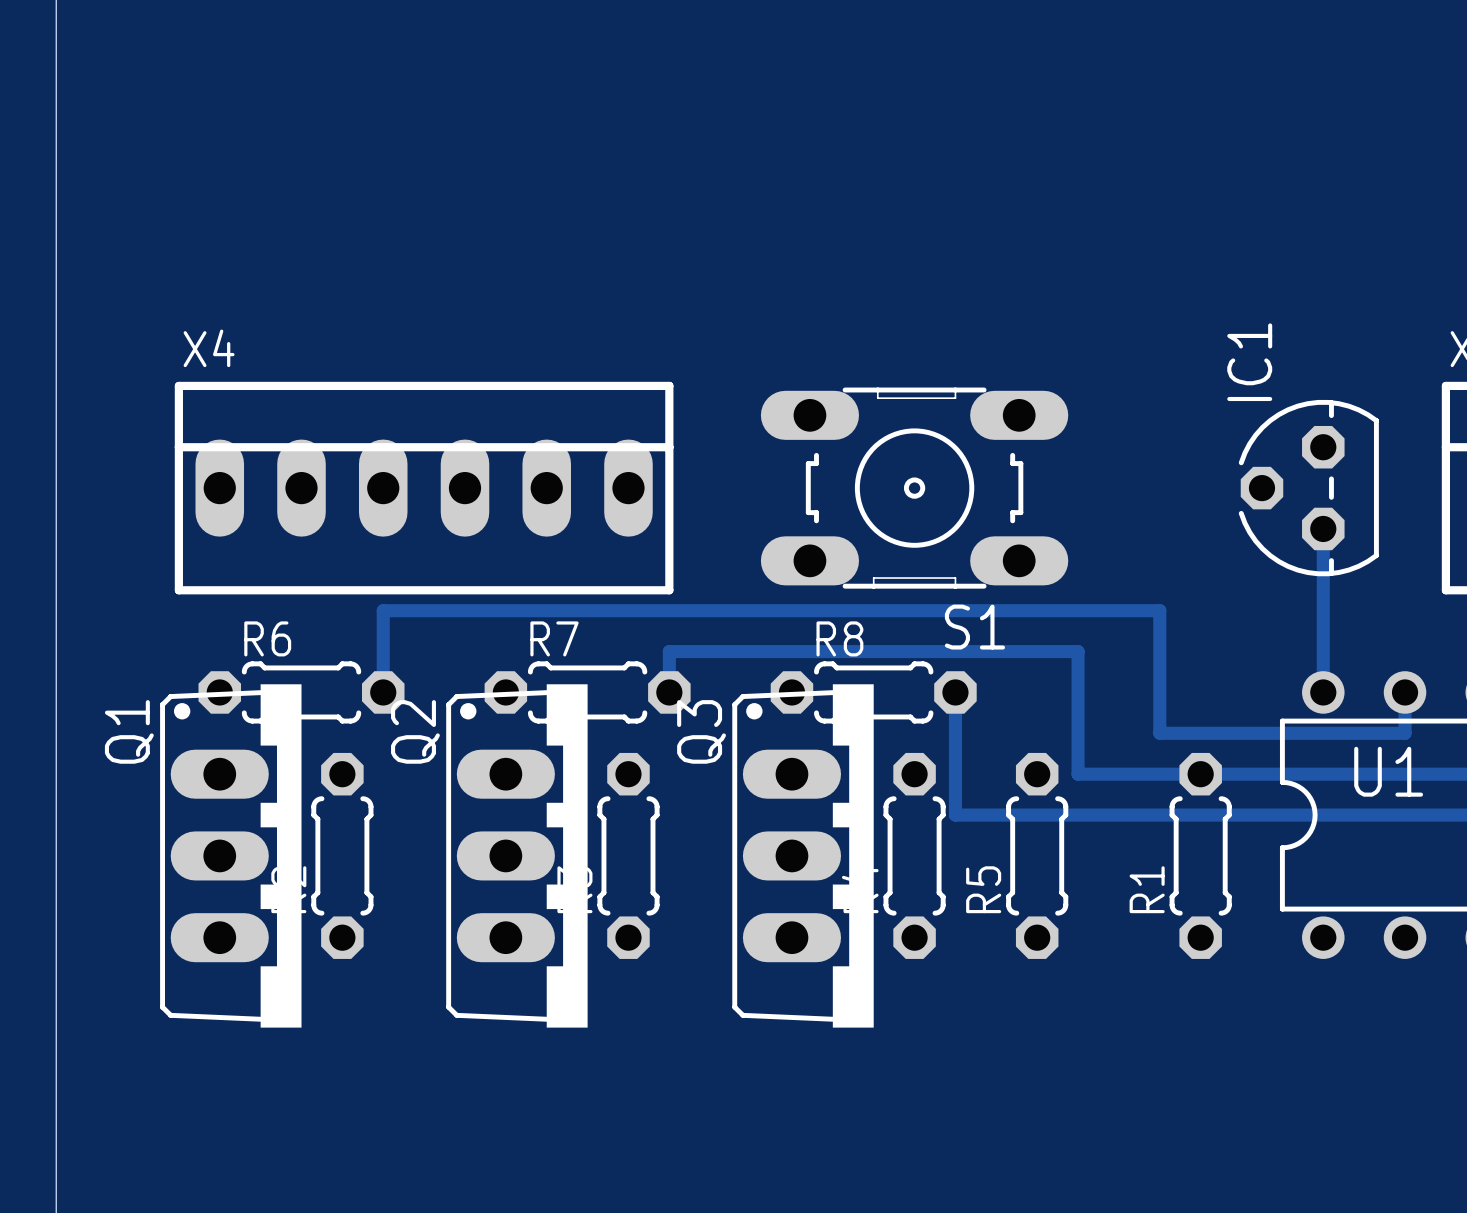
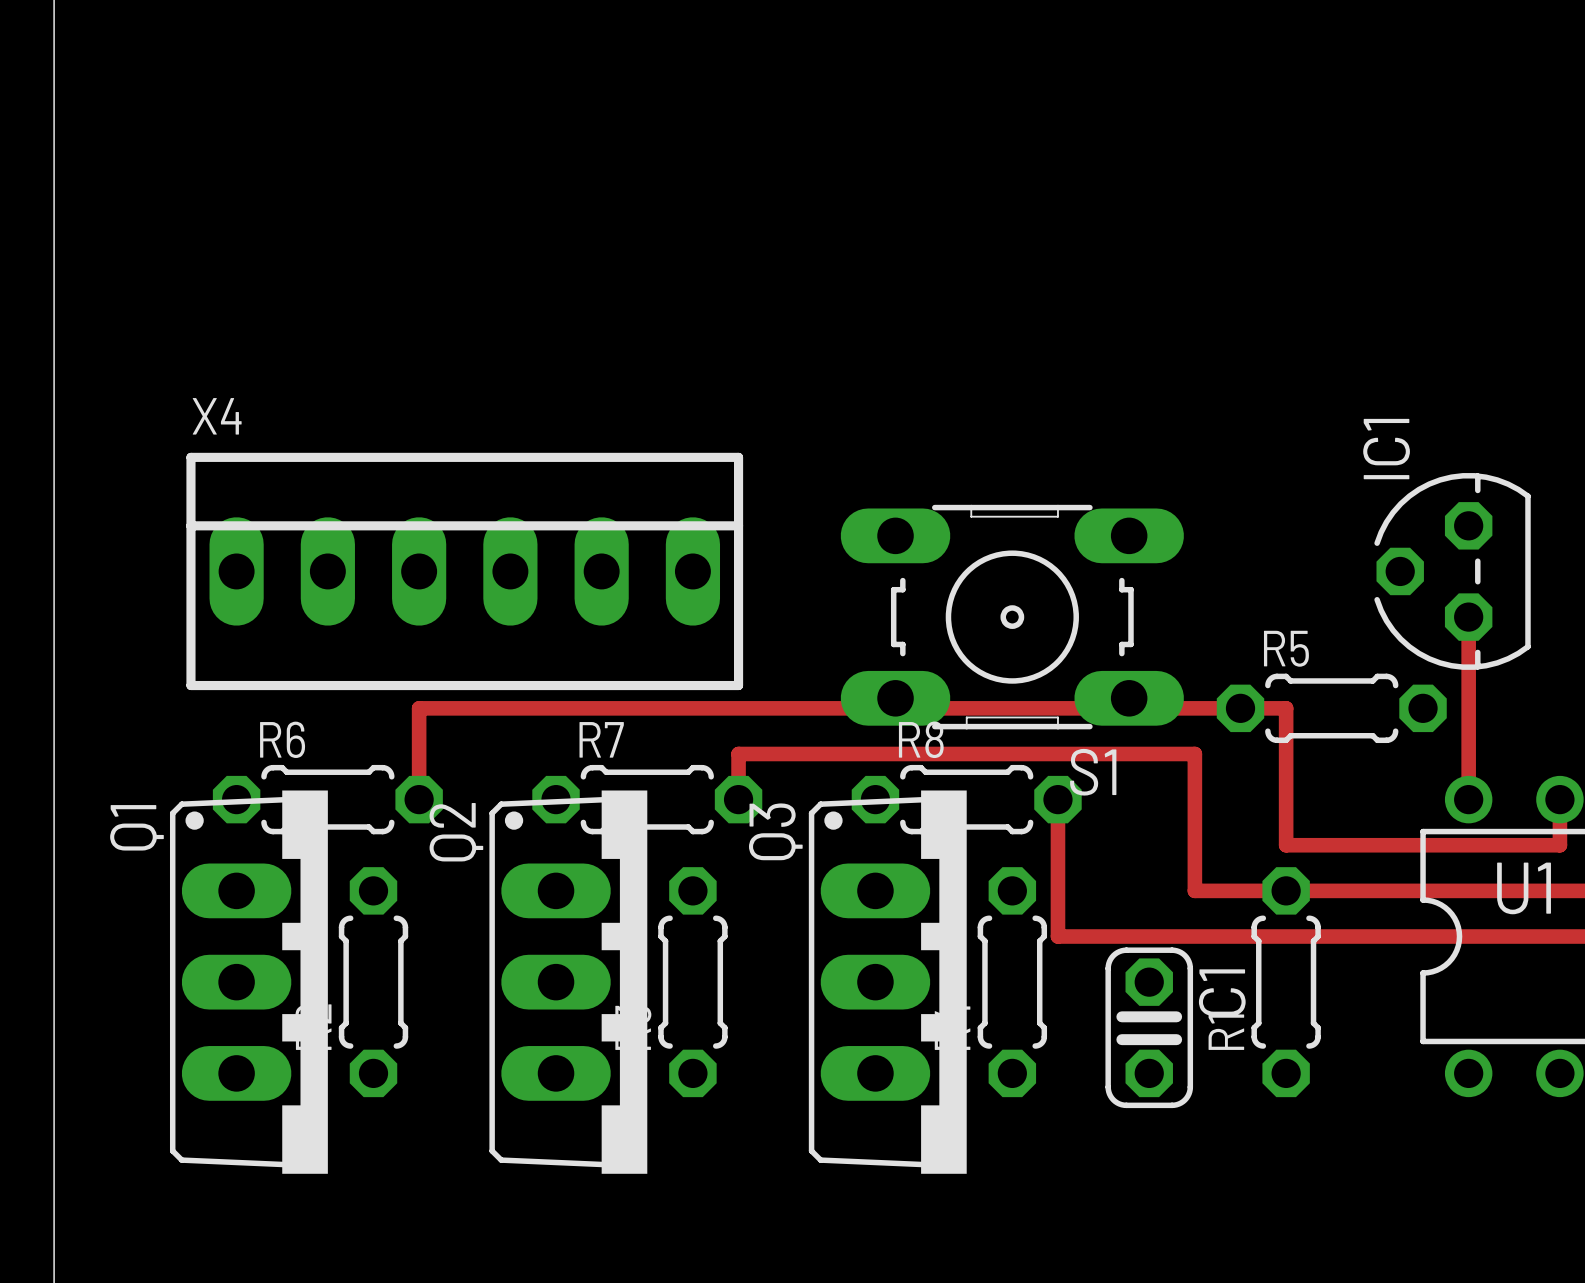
S1 position: (914, 488) -> (1012, 617)
R5 rotation: 0° (1037, 855) -> 90° clockwise (1331, 708)
R5 position: (1037, 855) -> (1331, 708)
R1 position: (1200, 855) -> (1286, 982)
C1: none -> (1149, 1027)

